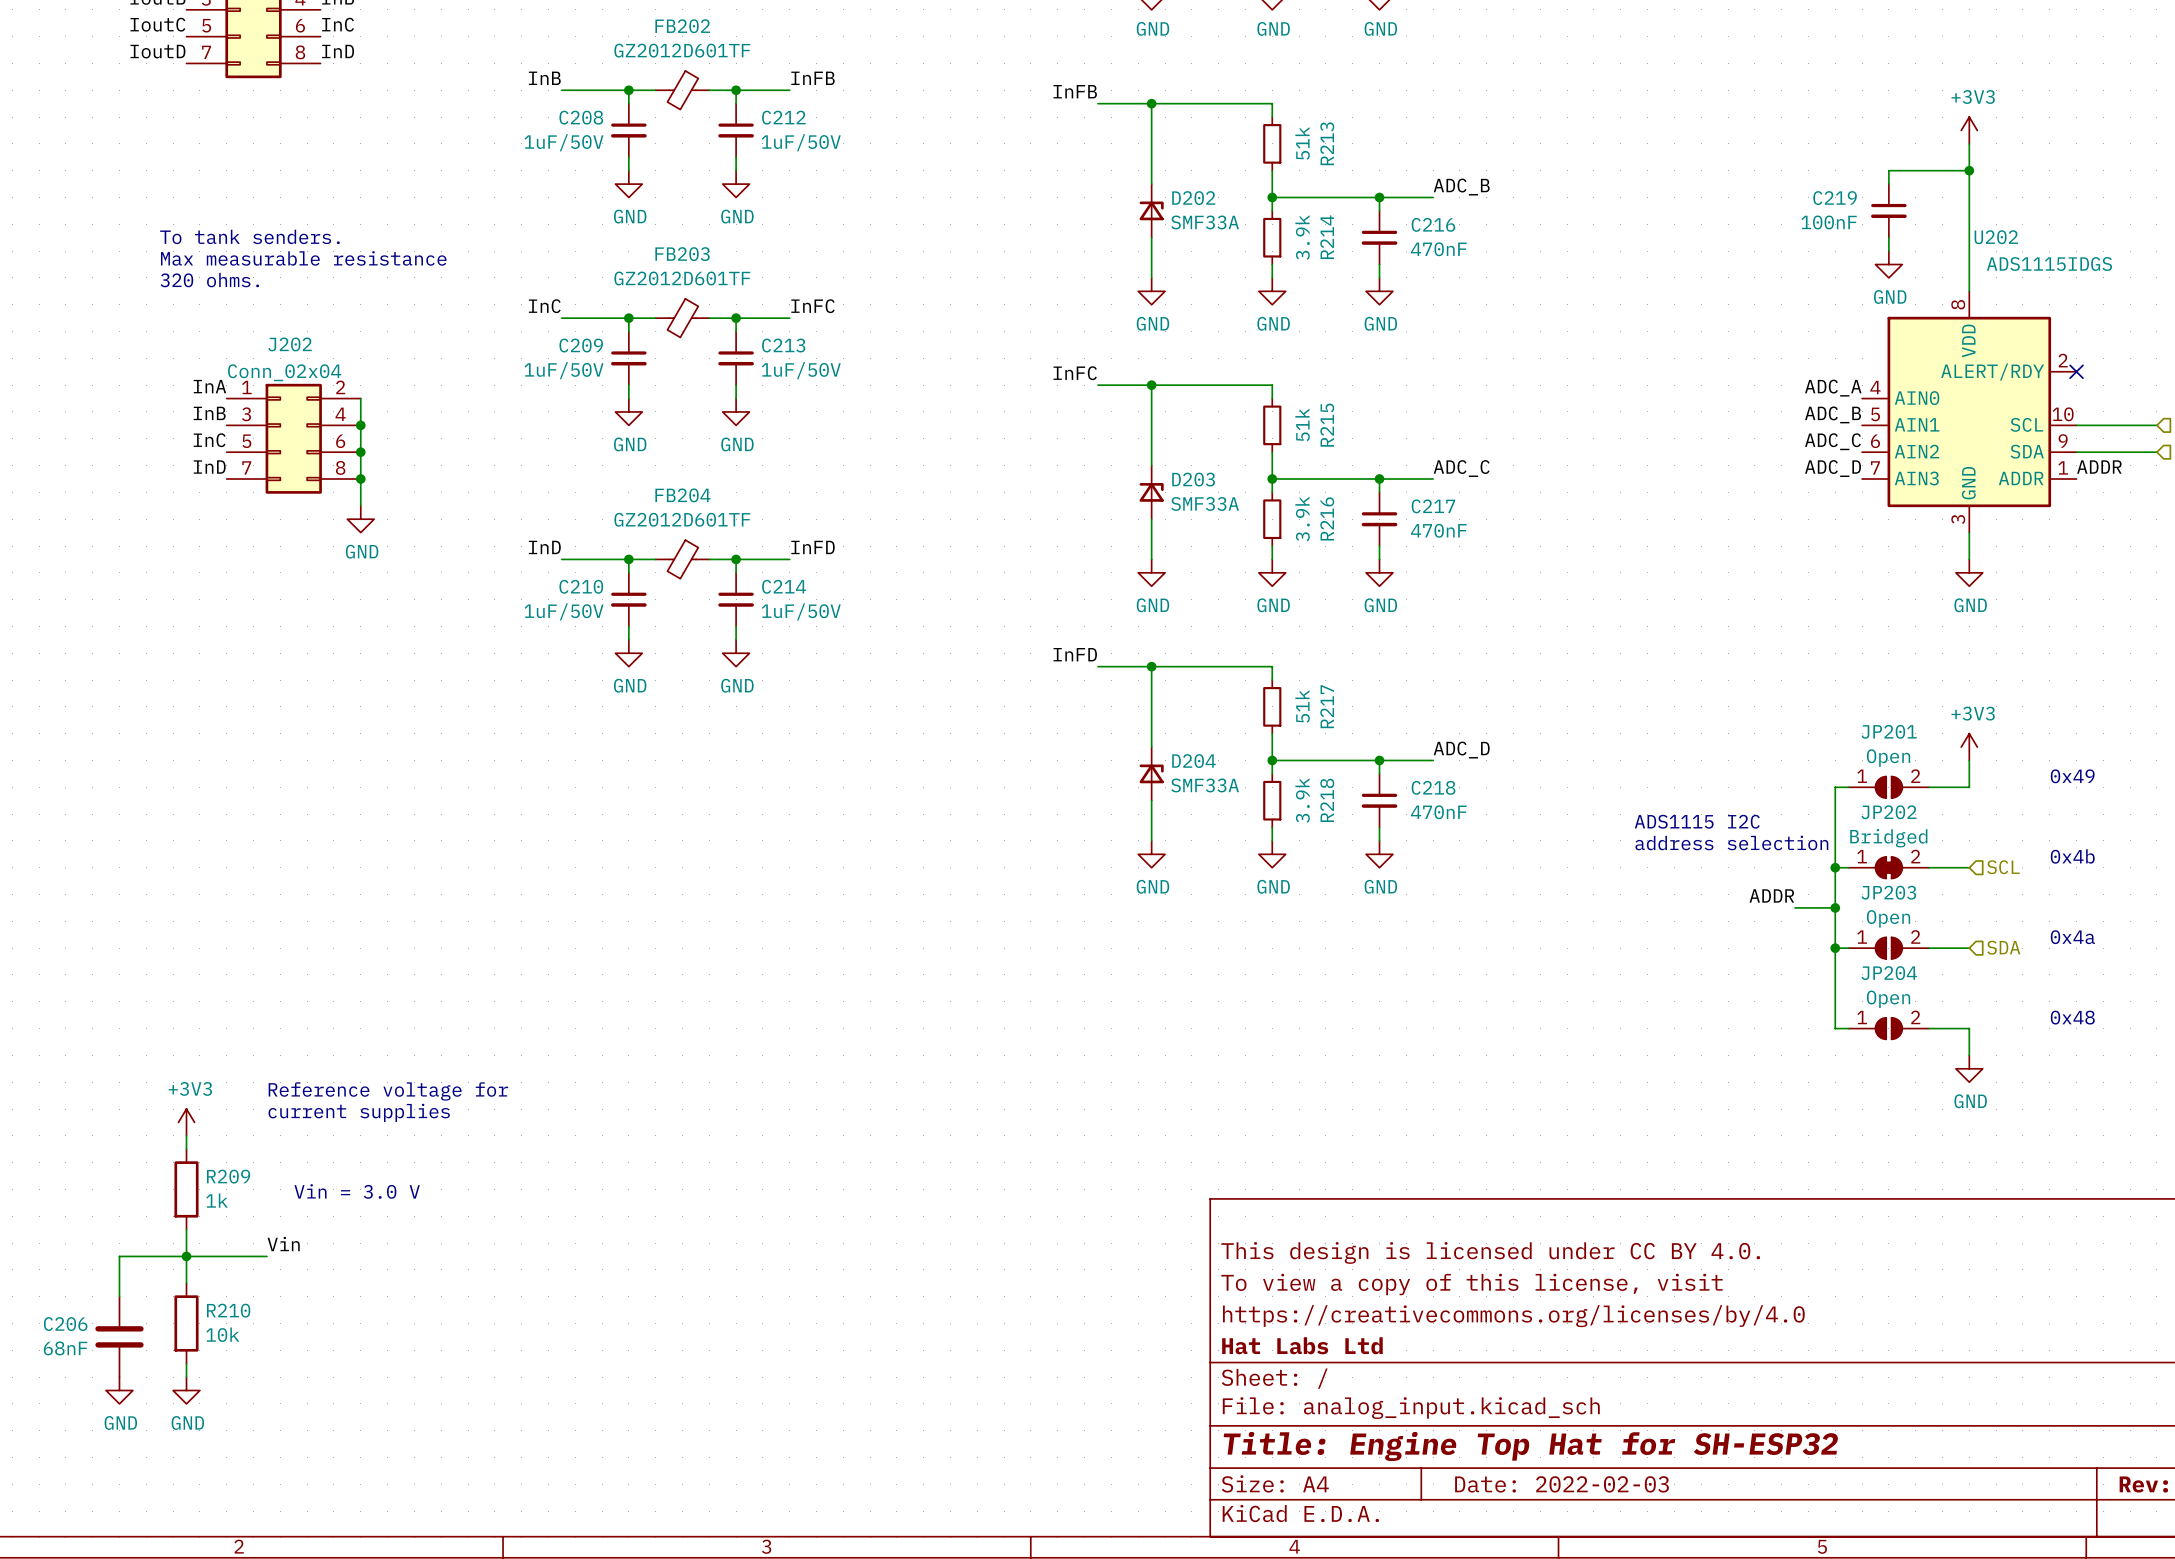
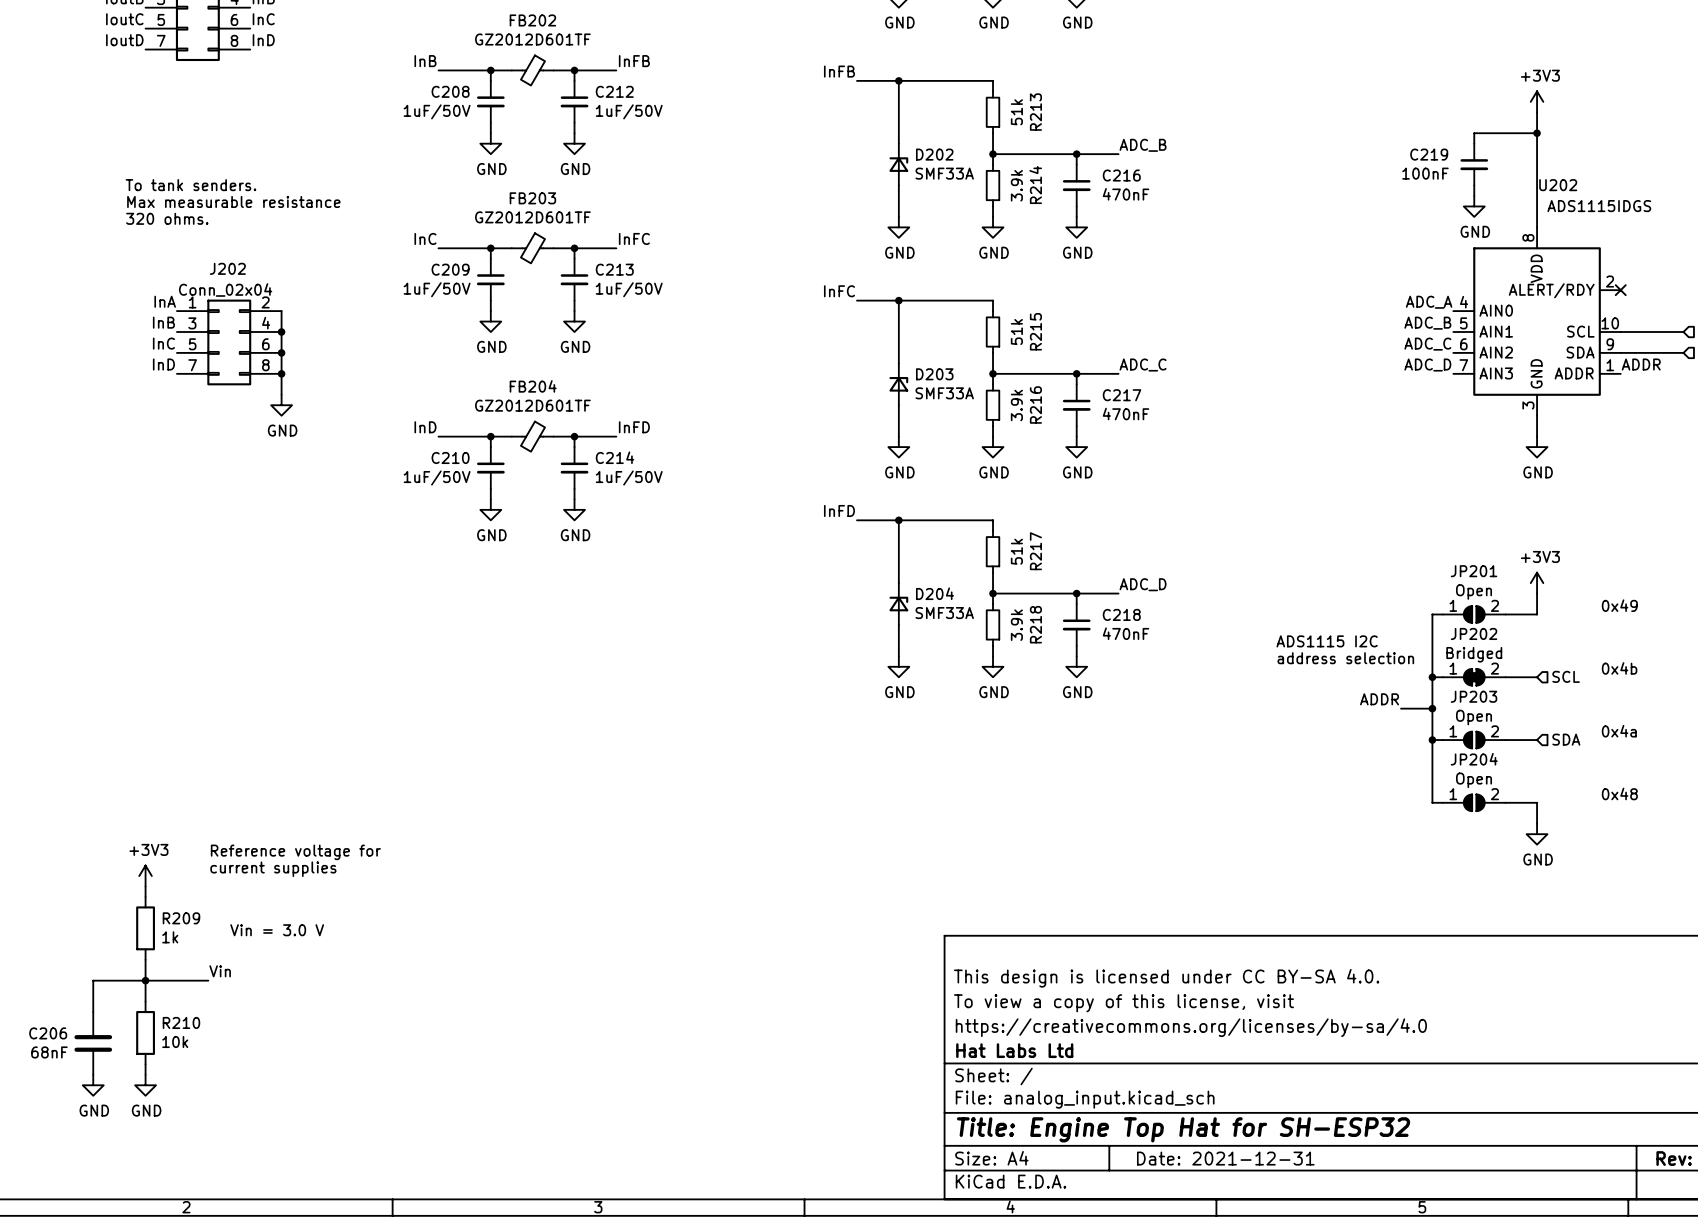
title block: This design is licensed under CC BY 4.0. (1490, 1252) -> This design is licensed under CC BY-SA 4.0. (1166, 978)
title block: https://creativecommons.org/licenses/by/4.0 (1513, 1316) -> https://creativecommons.org/licenses/by-sa/4.0 (1191, 1027)
title block: Date: 2022-02-03 (1562, 1484) -> Date: 2021-12-31 (1225, 1158)

